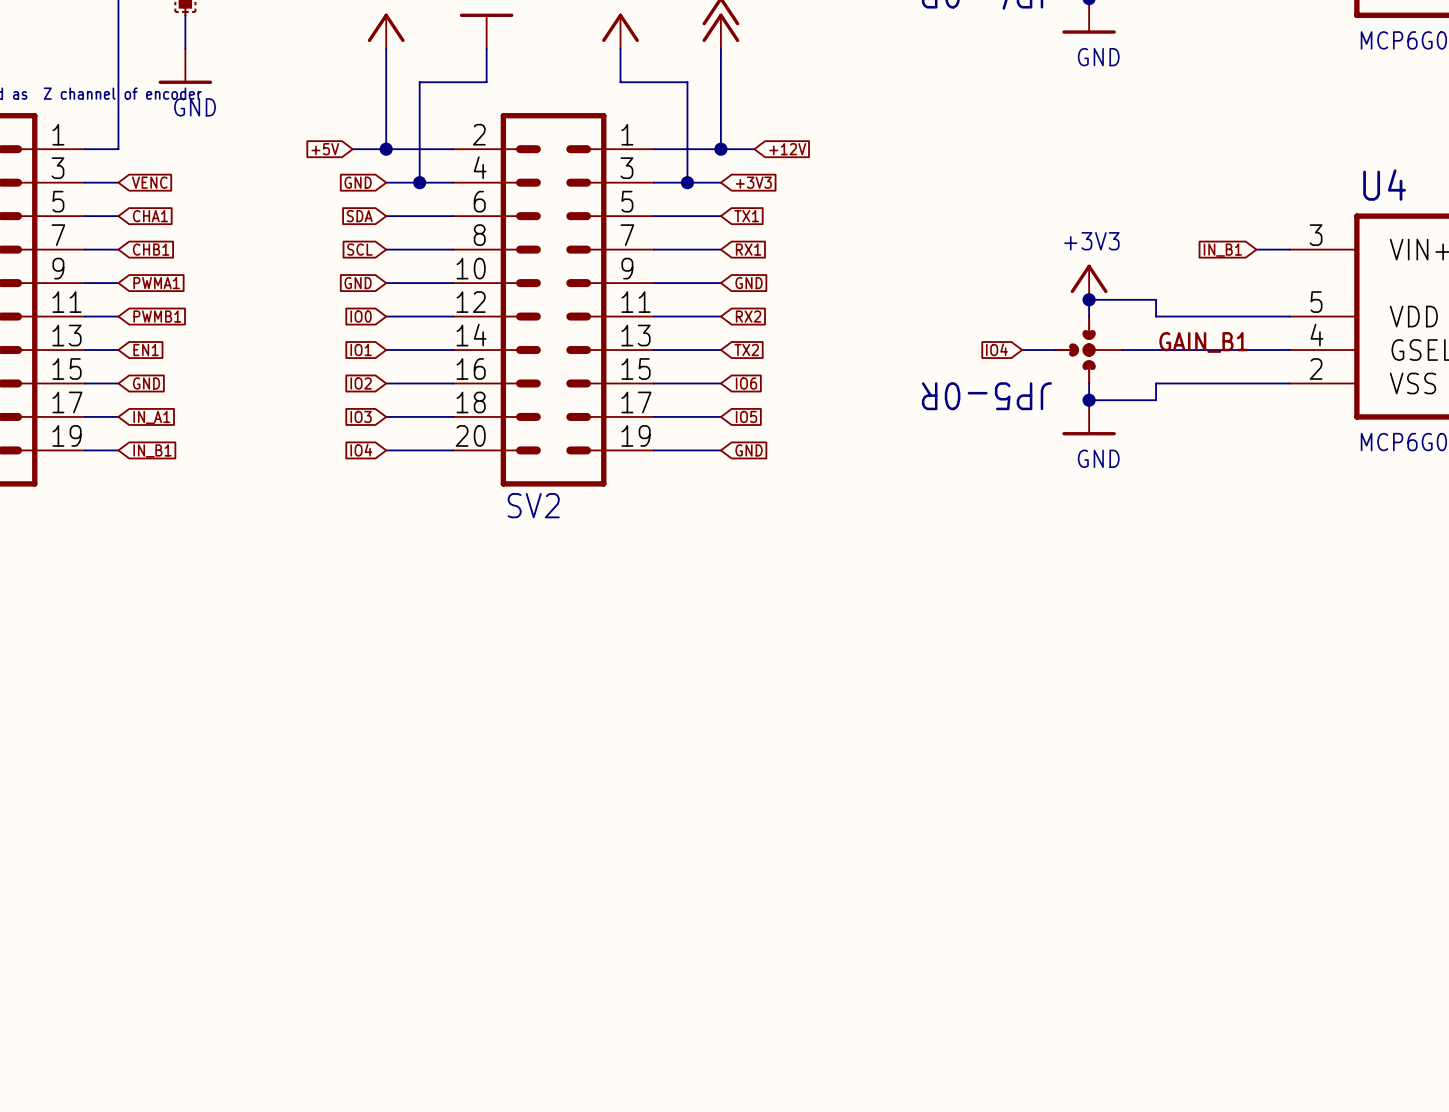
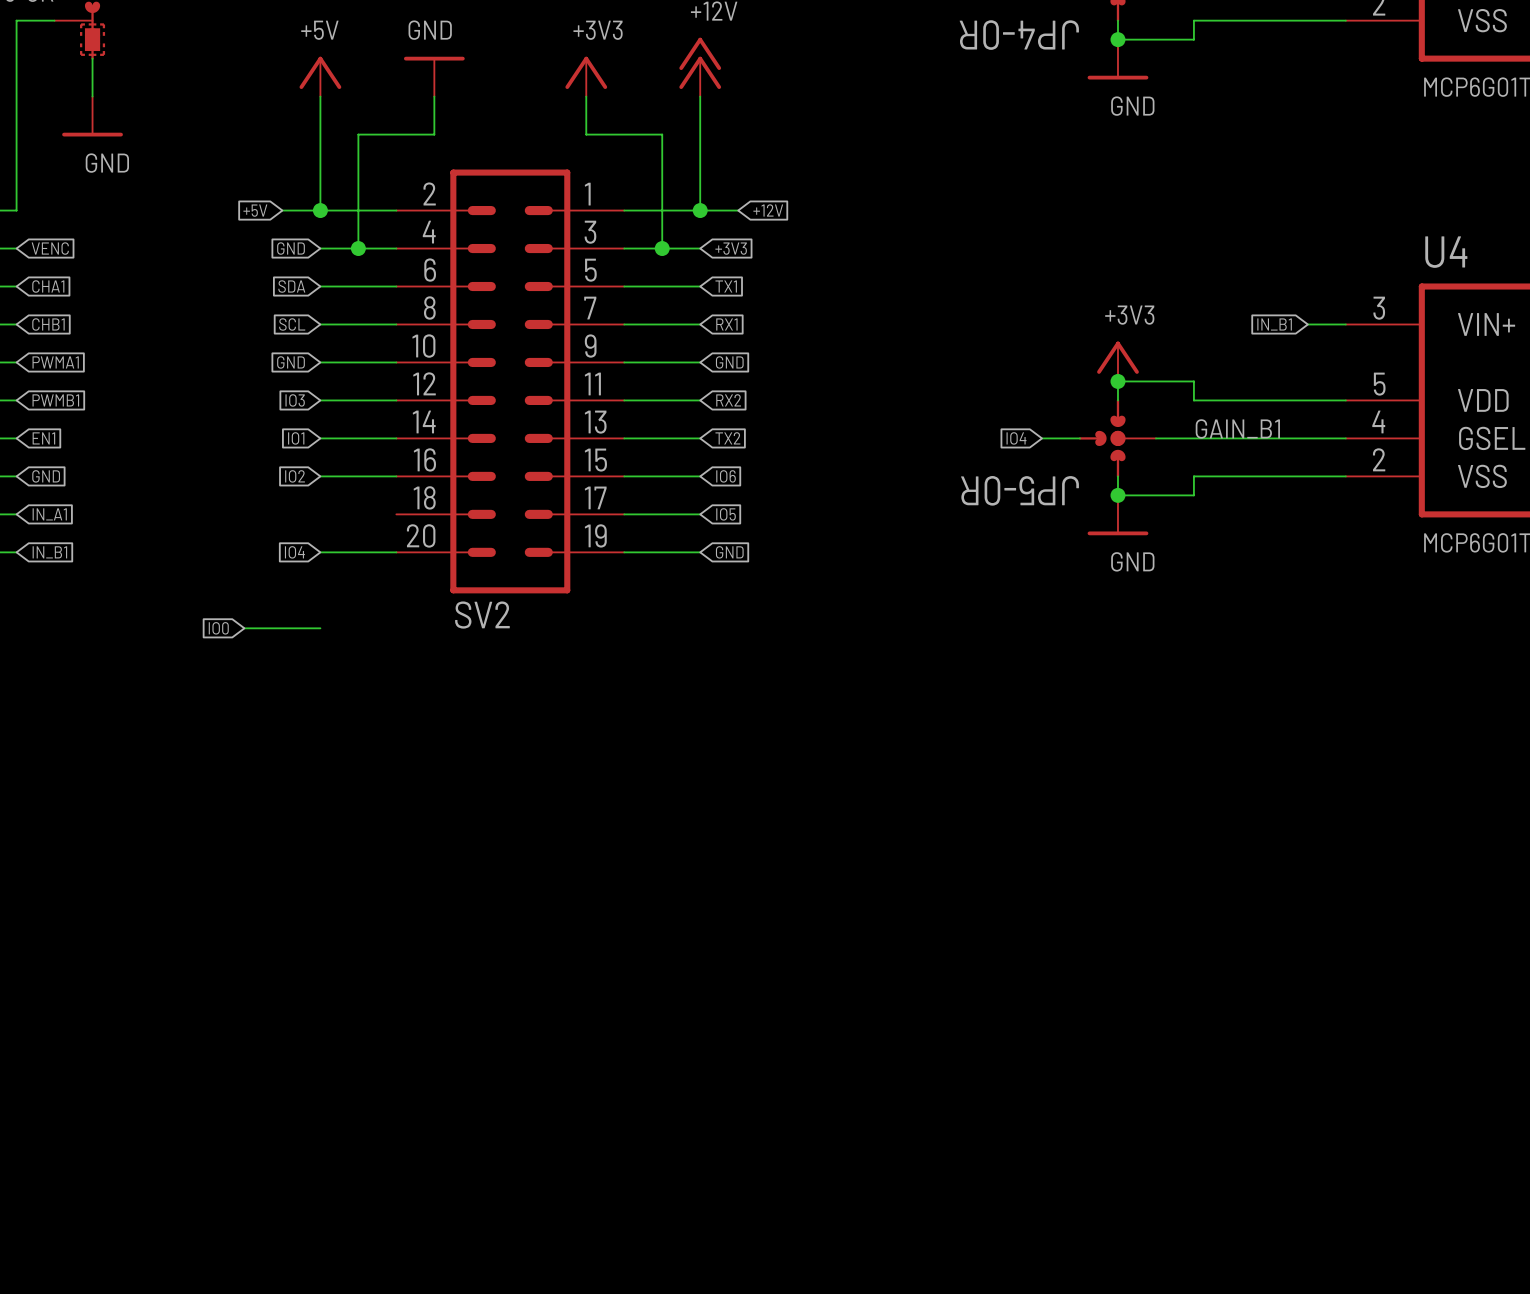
global label: IO0 (361, 316) -> IO3 (295, 400)
global label: IO3 (361, 416) -> none
wire: (386, 416) (453, 416) -> (244, 628) (320, 628)
global label: none -> IO0 (218, 628)

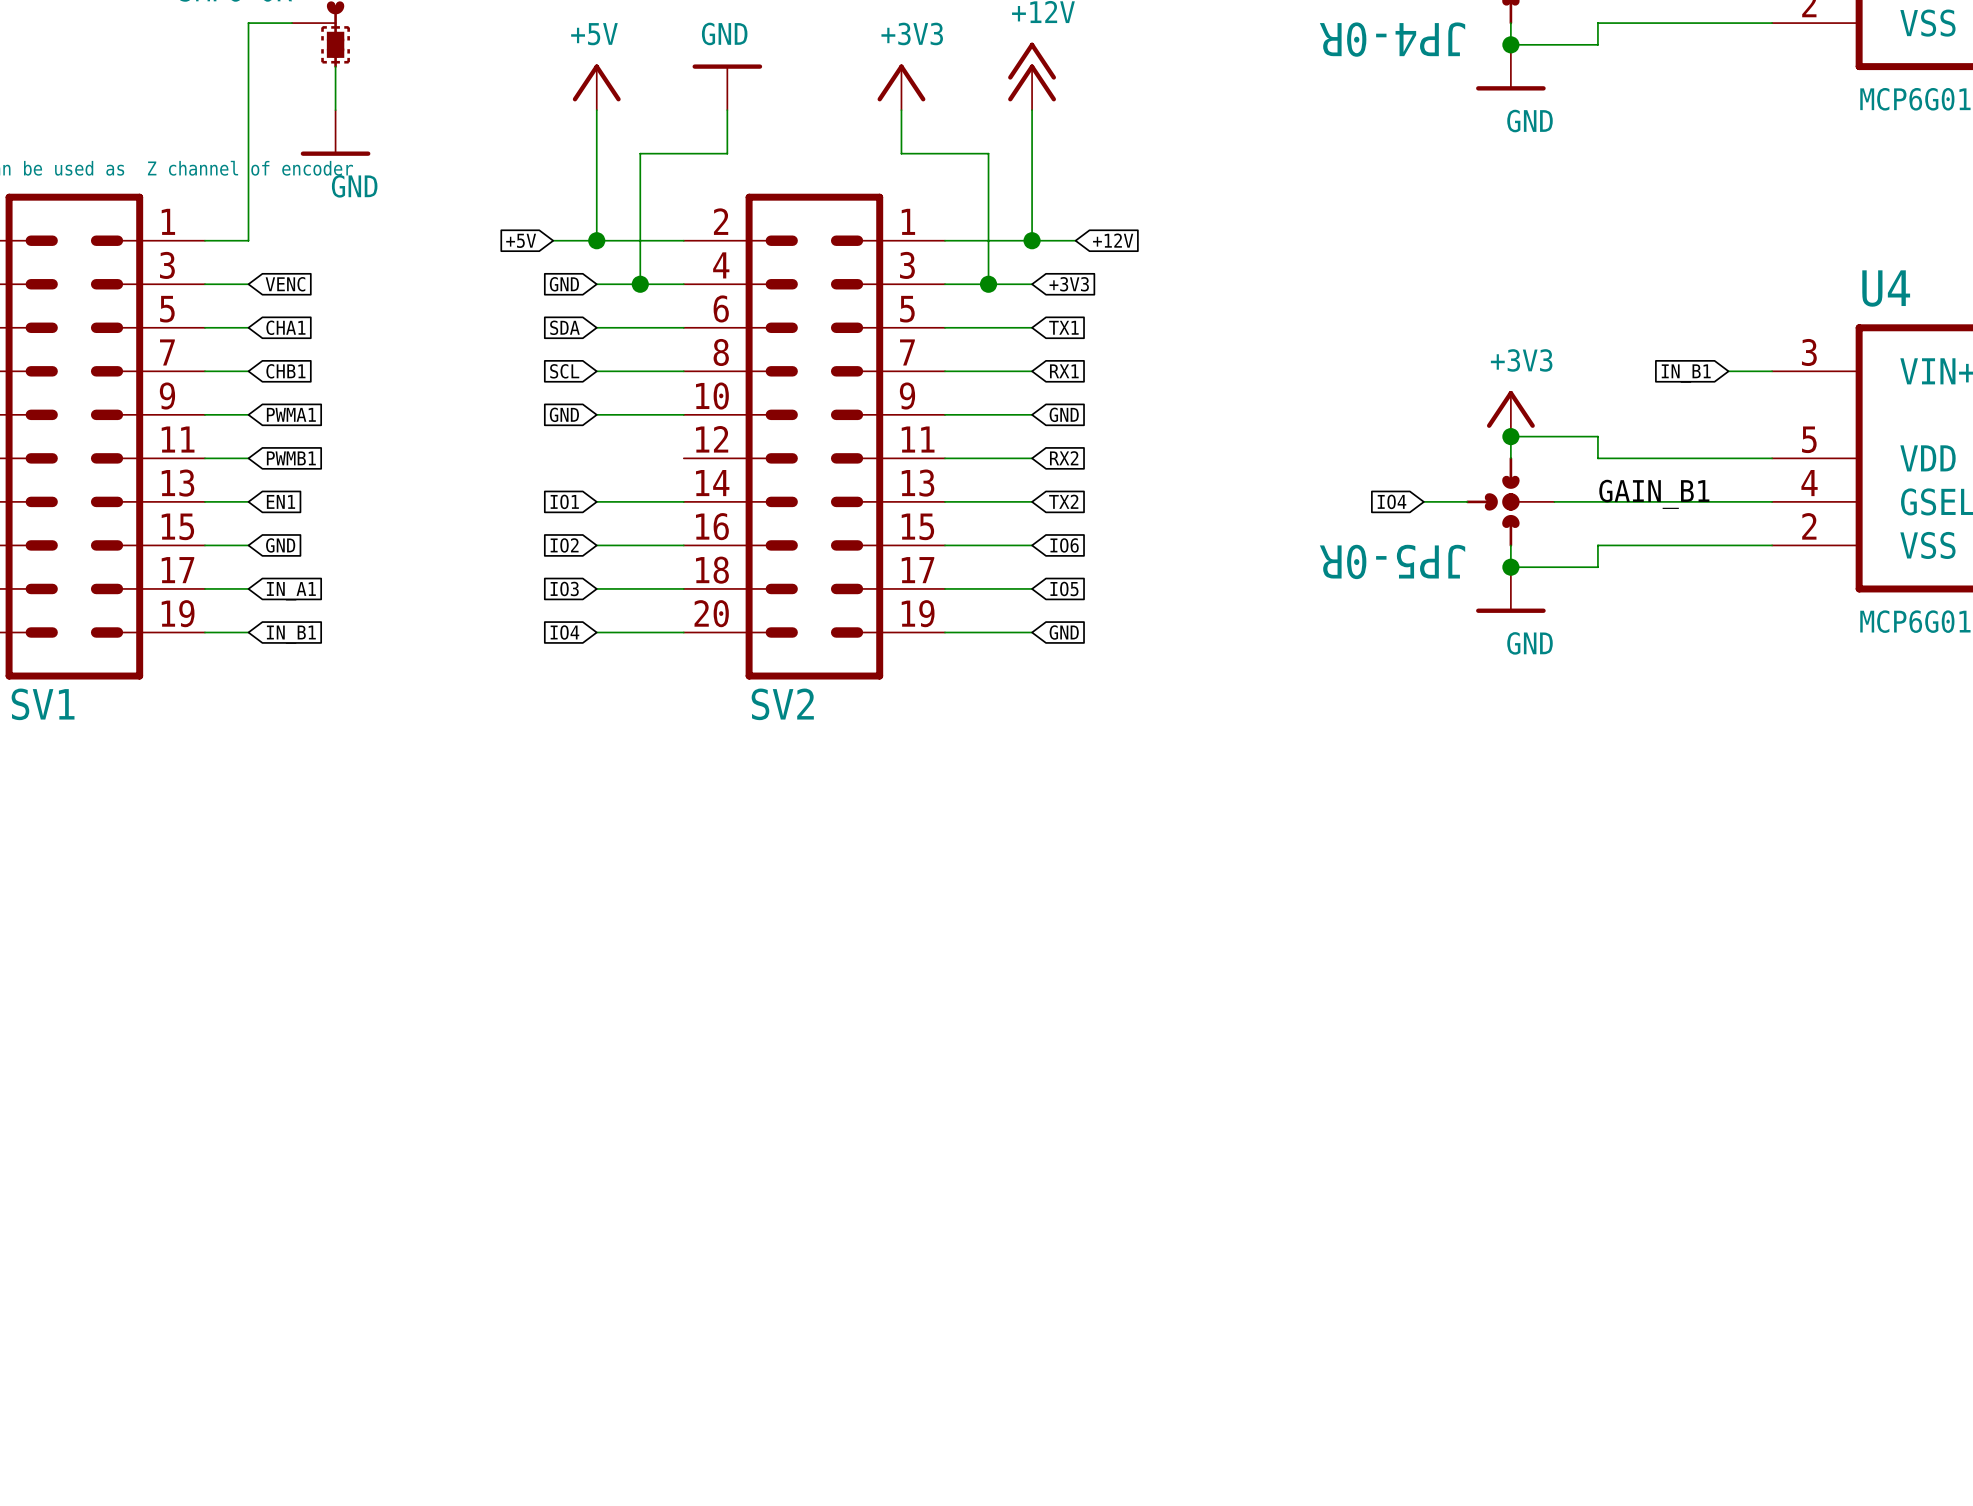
global label position: IO3 (295, 400) -> IO3 (564, 588)
wire: (320, 400) (396, 400) -> (596, 588) (683, 588)
global label: IO0 (218, 628) -> none
wire: (244, 628) (320, 628) -> none

